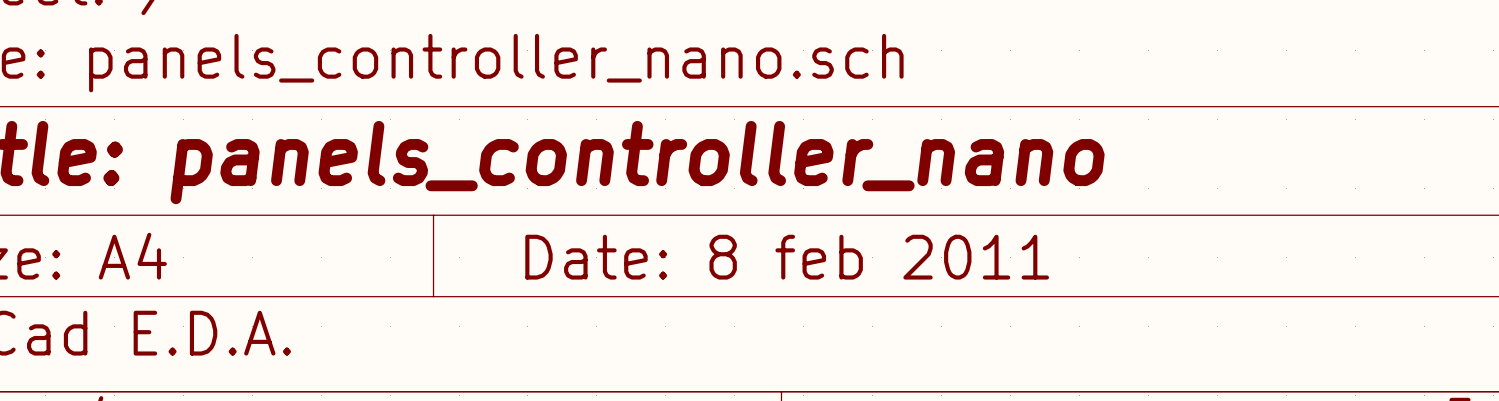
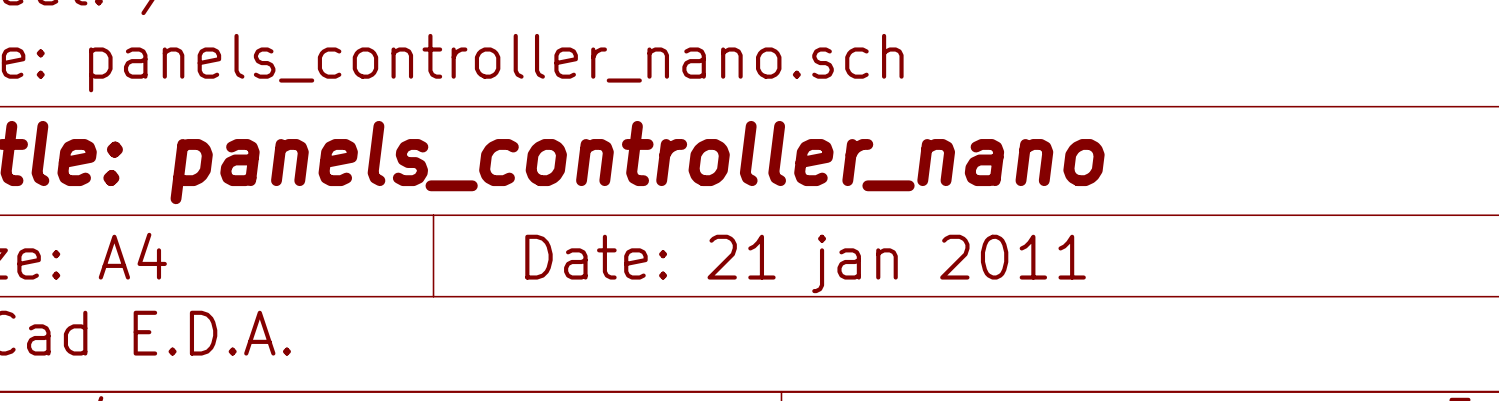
title block: Date: 8 feb 2011 (787, 257) -> Date: 21 jan 2011 (805, 263)

